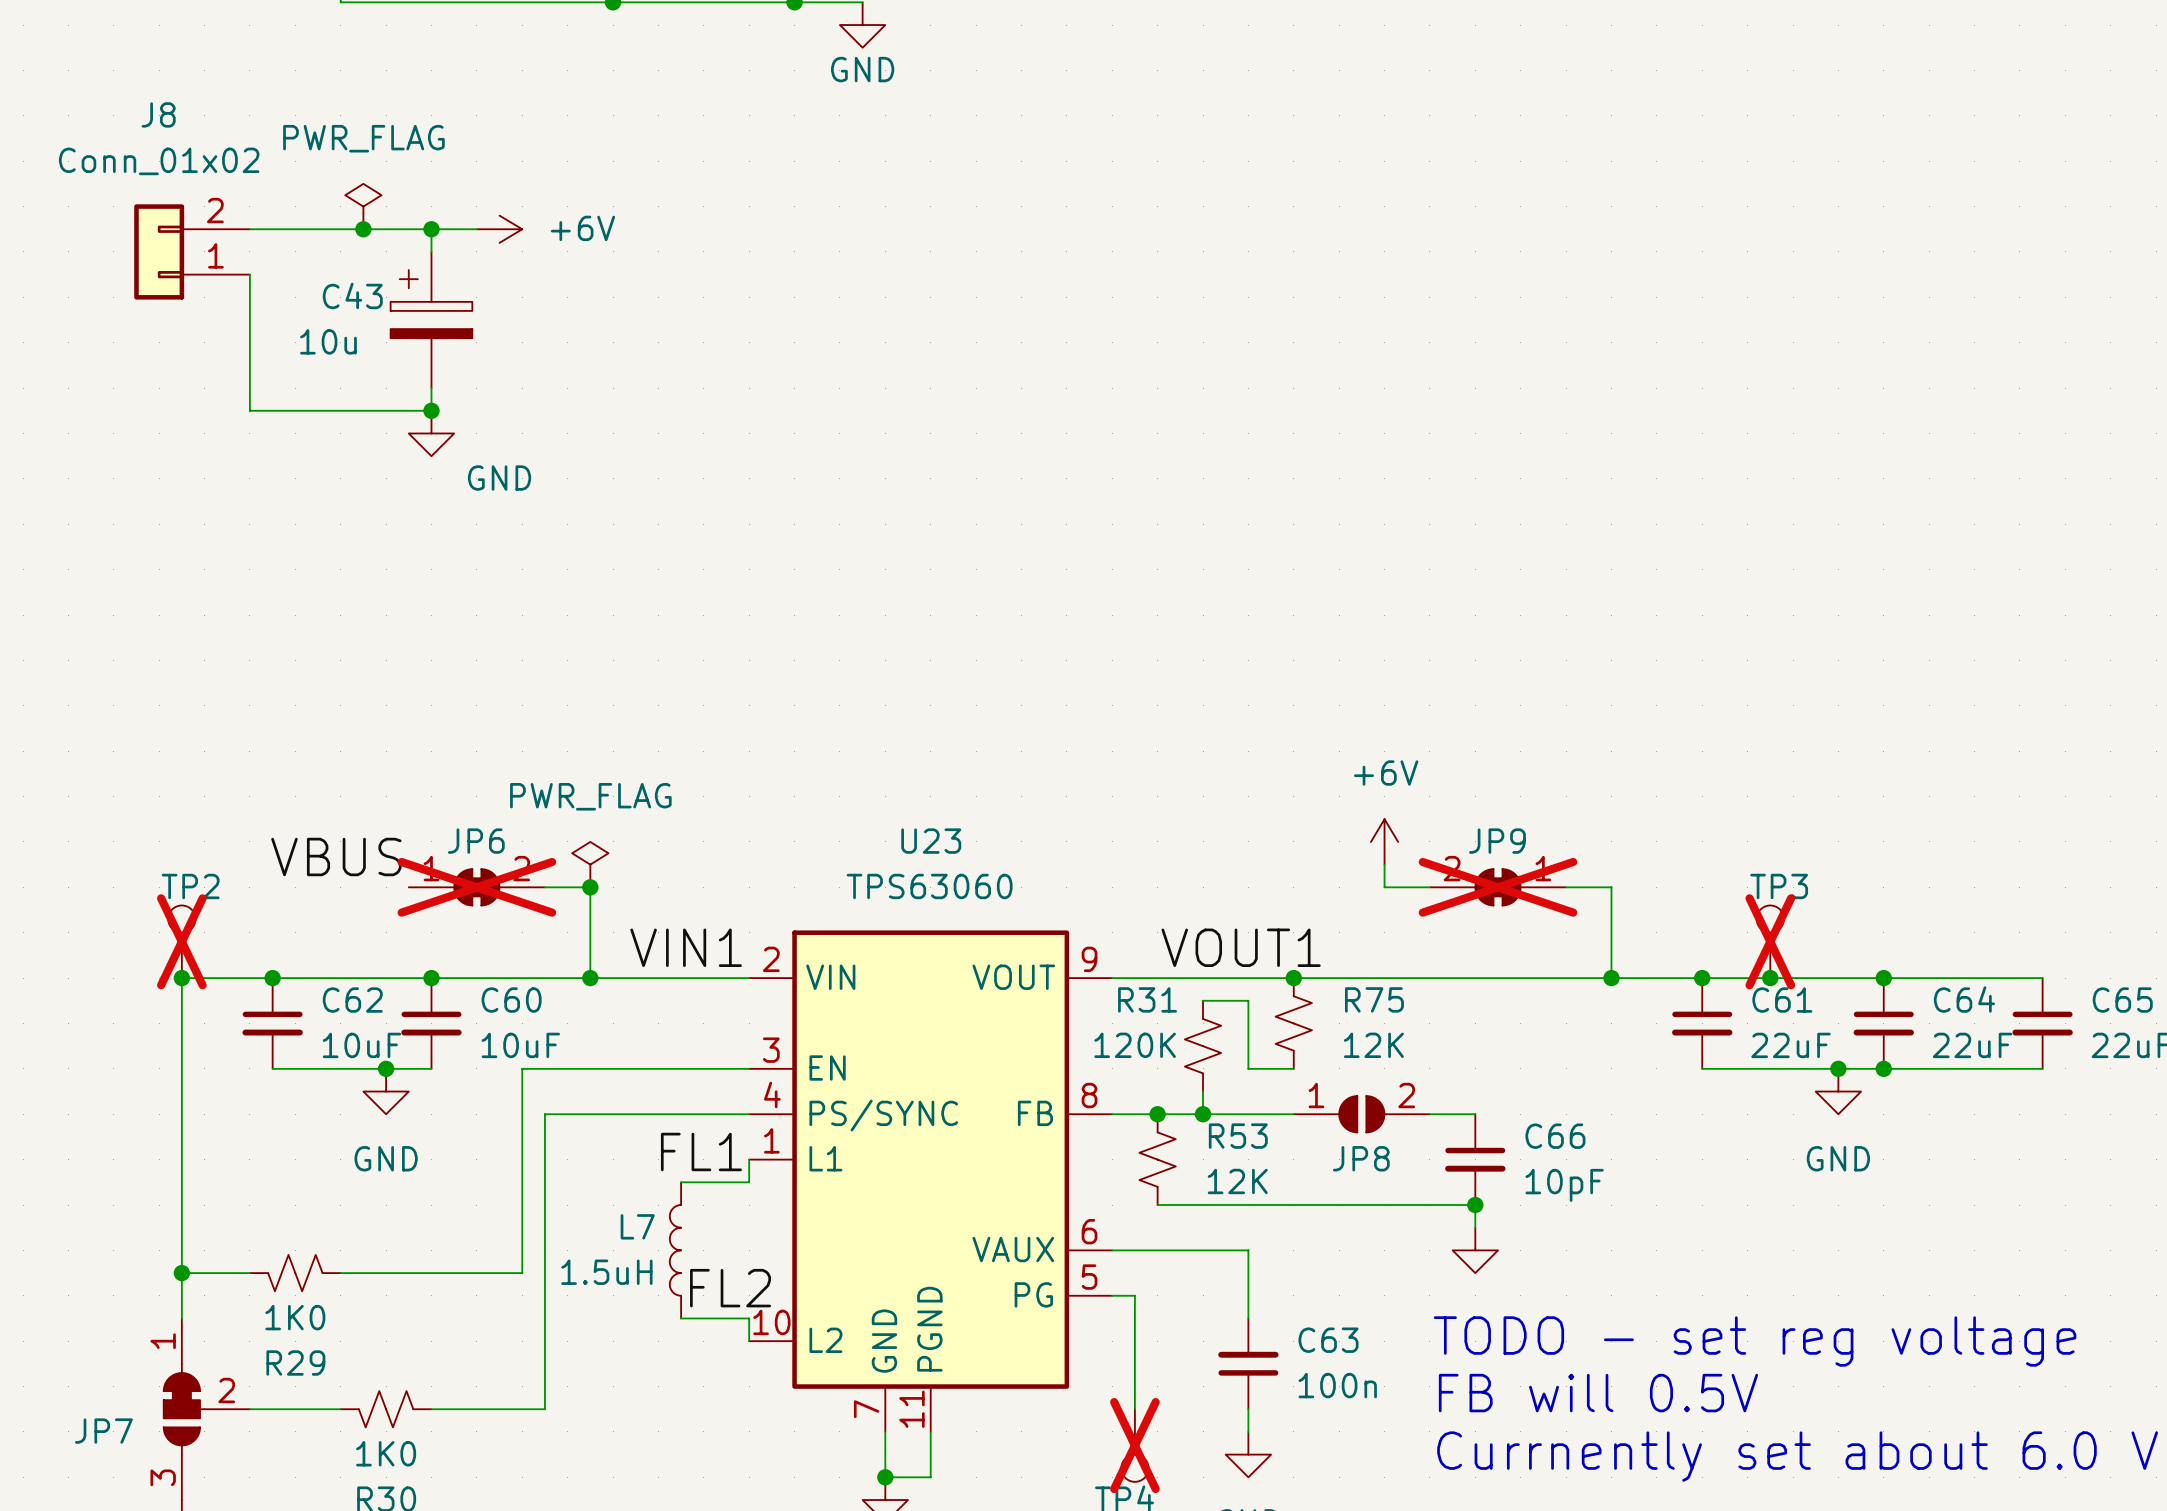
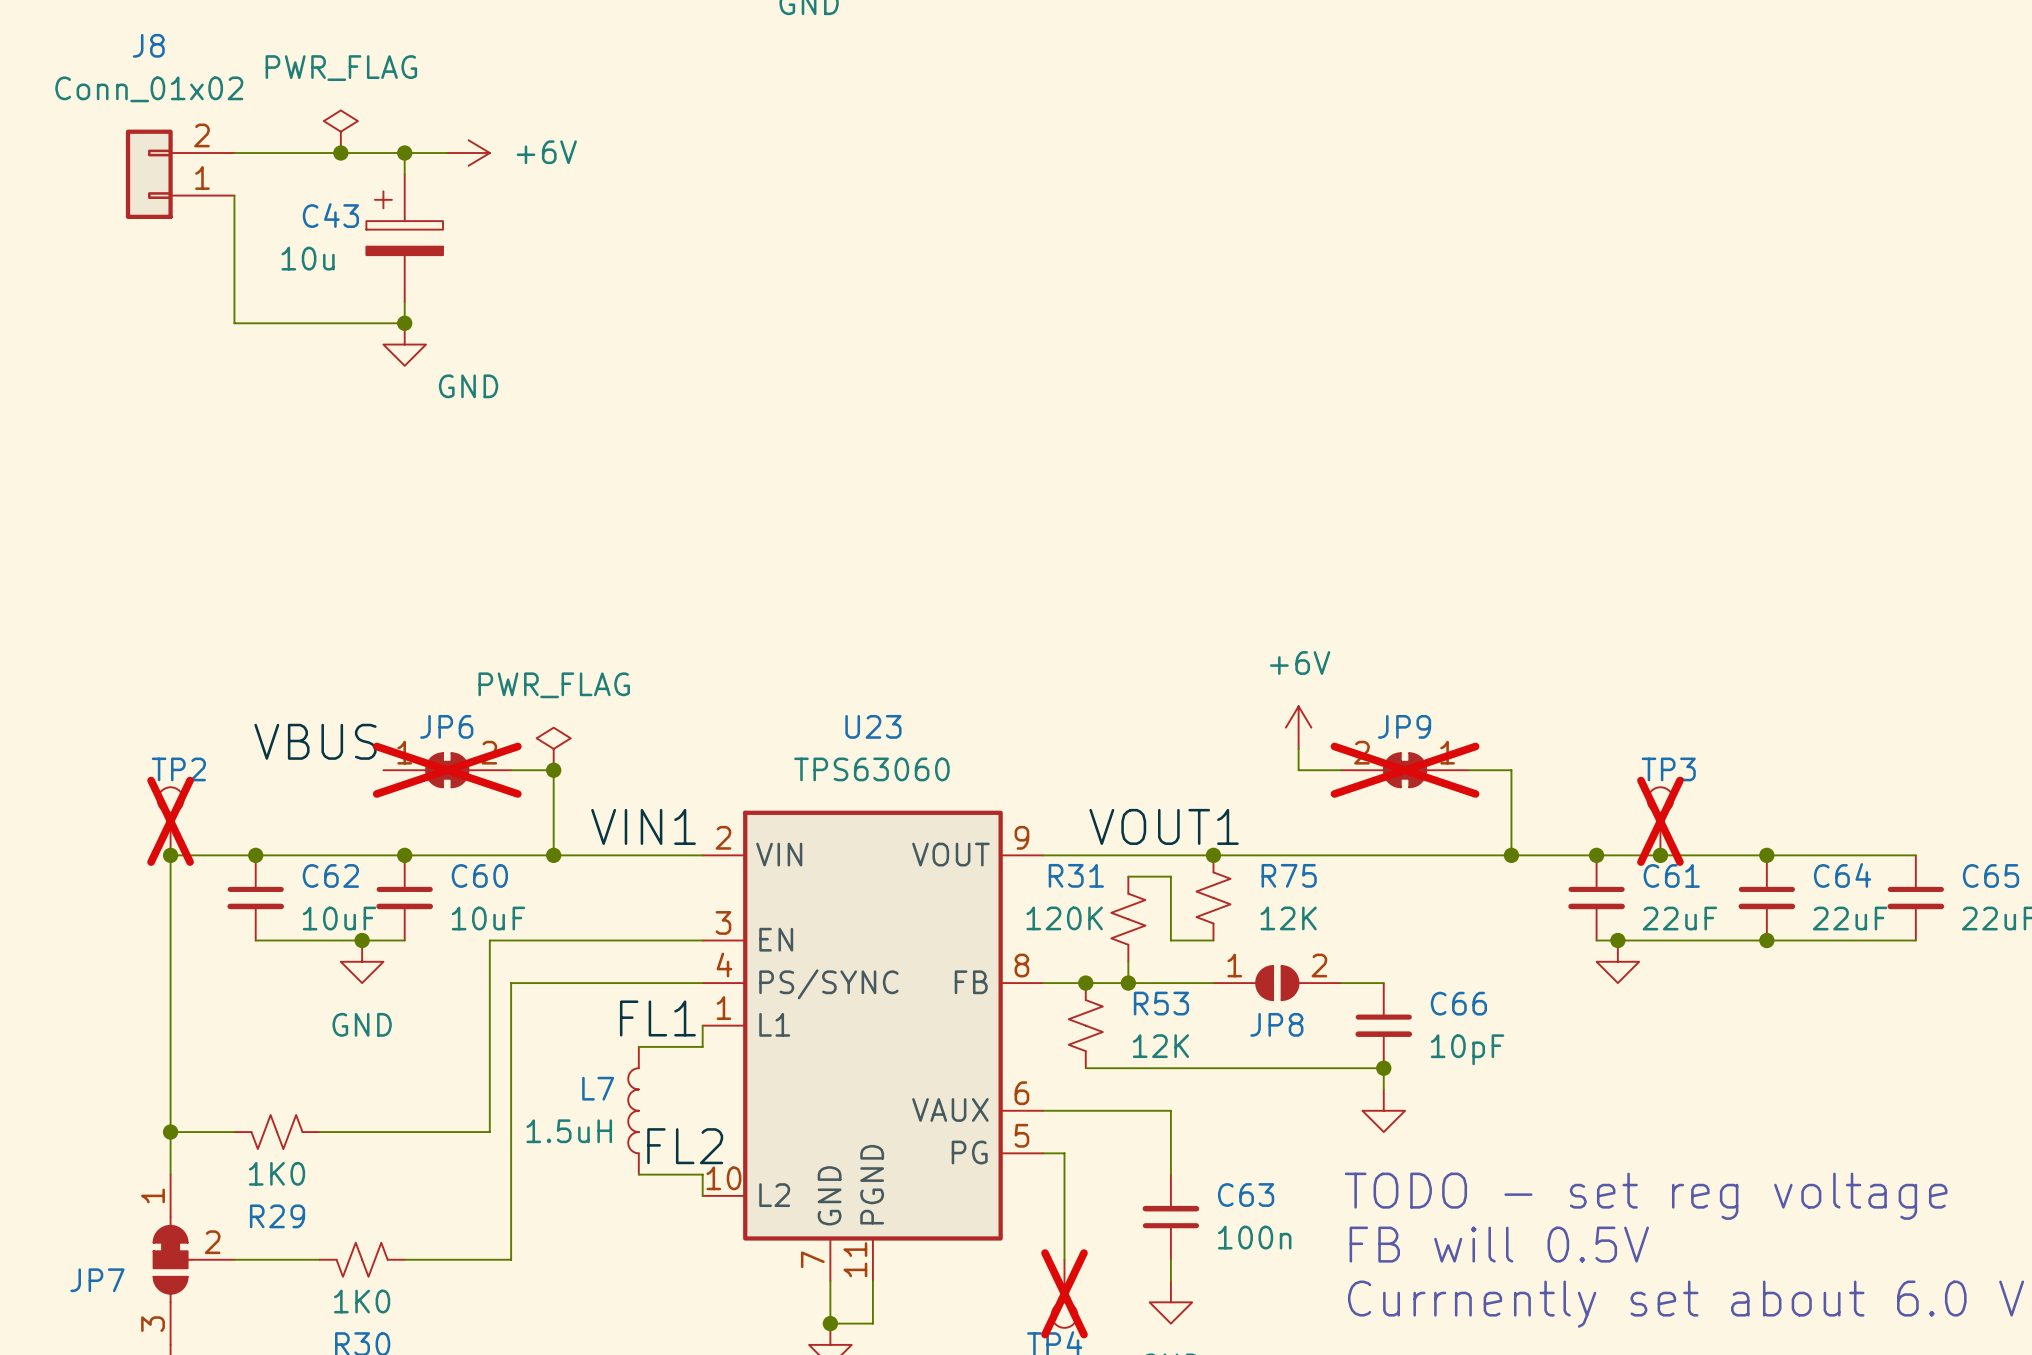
junction: none -> (1617, 940)
junction: (1838, 1068) -> none
power symbol: none -> (1617, 961)
power symbol: GND (1838, 1091) -> none

